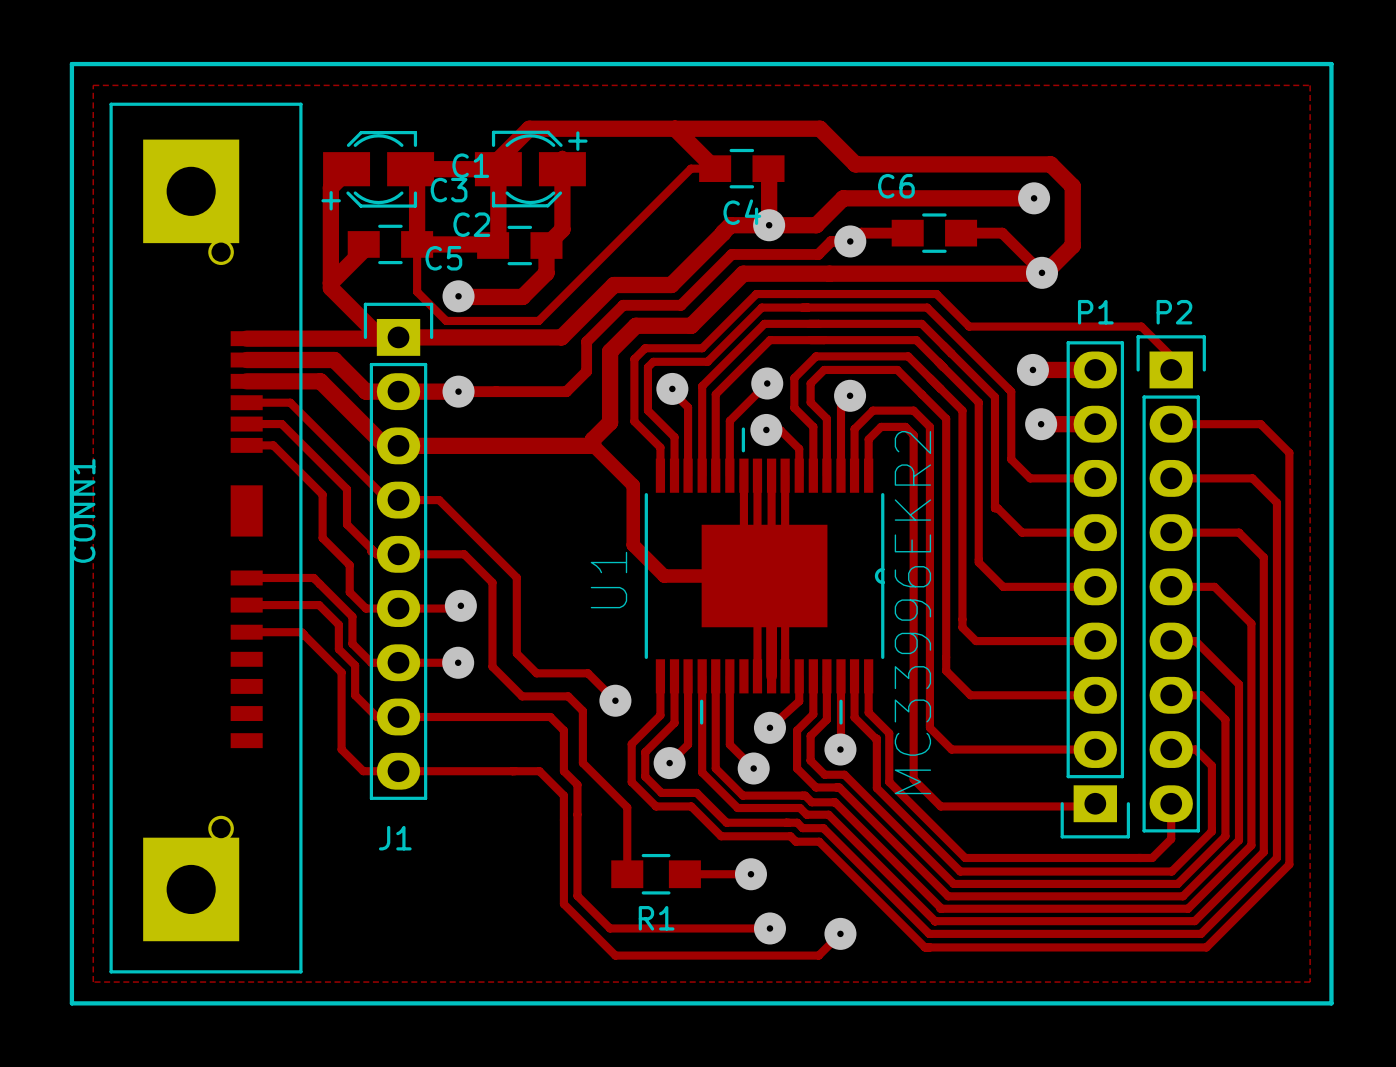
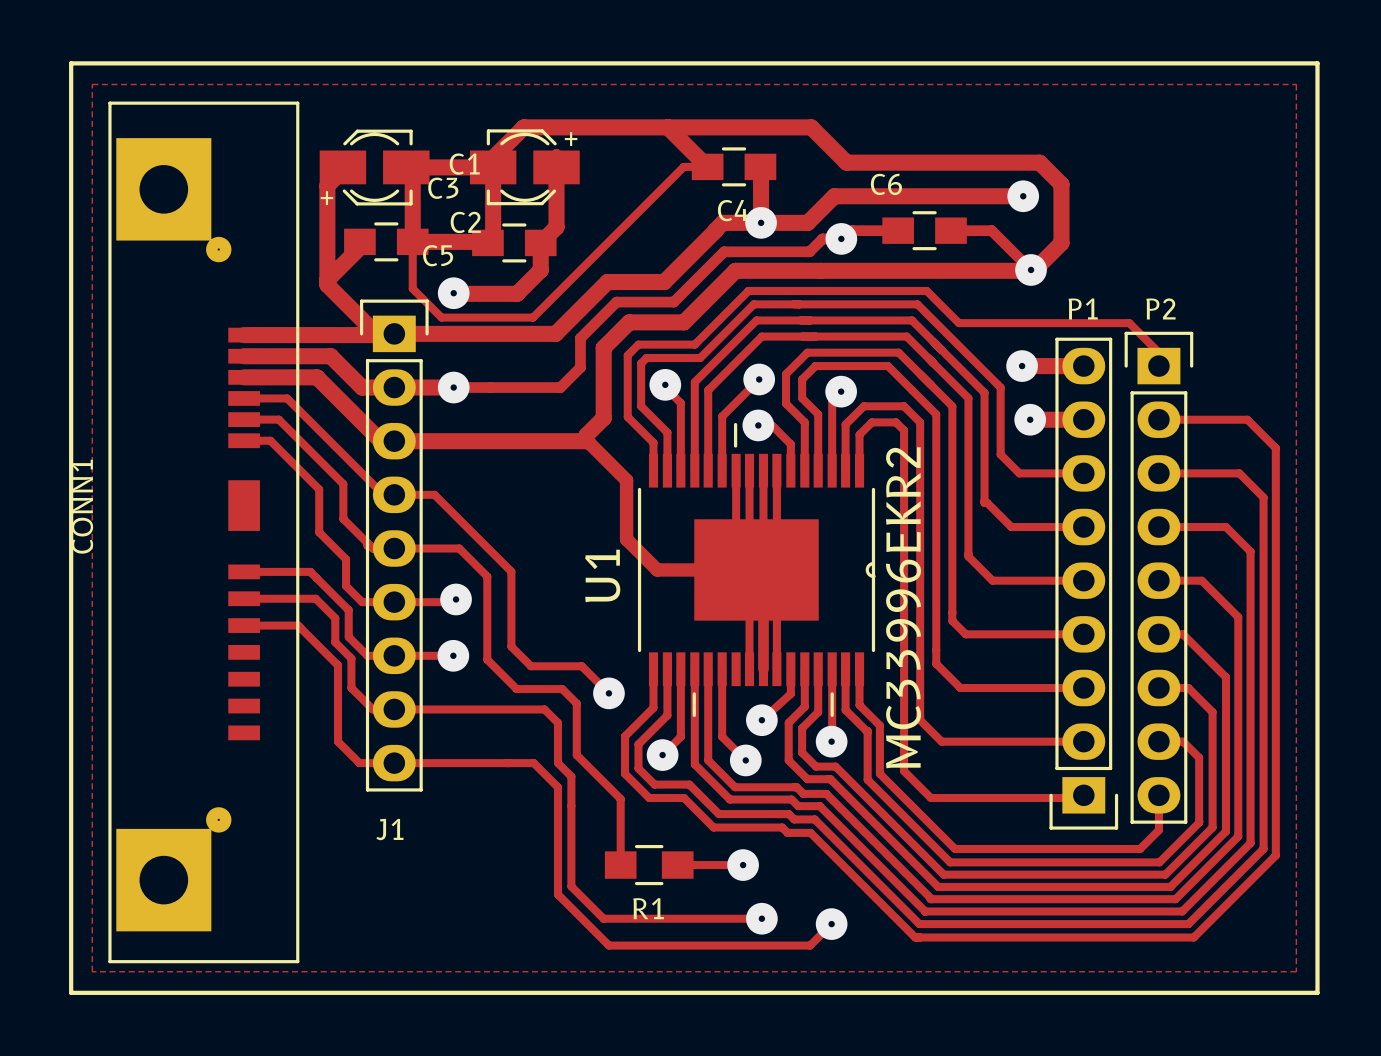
CONN1 footprint: [109, 102, 303, 974] -> [108, 101, 300, 964]

